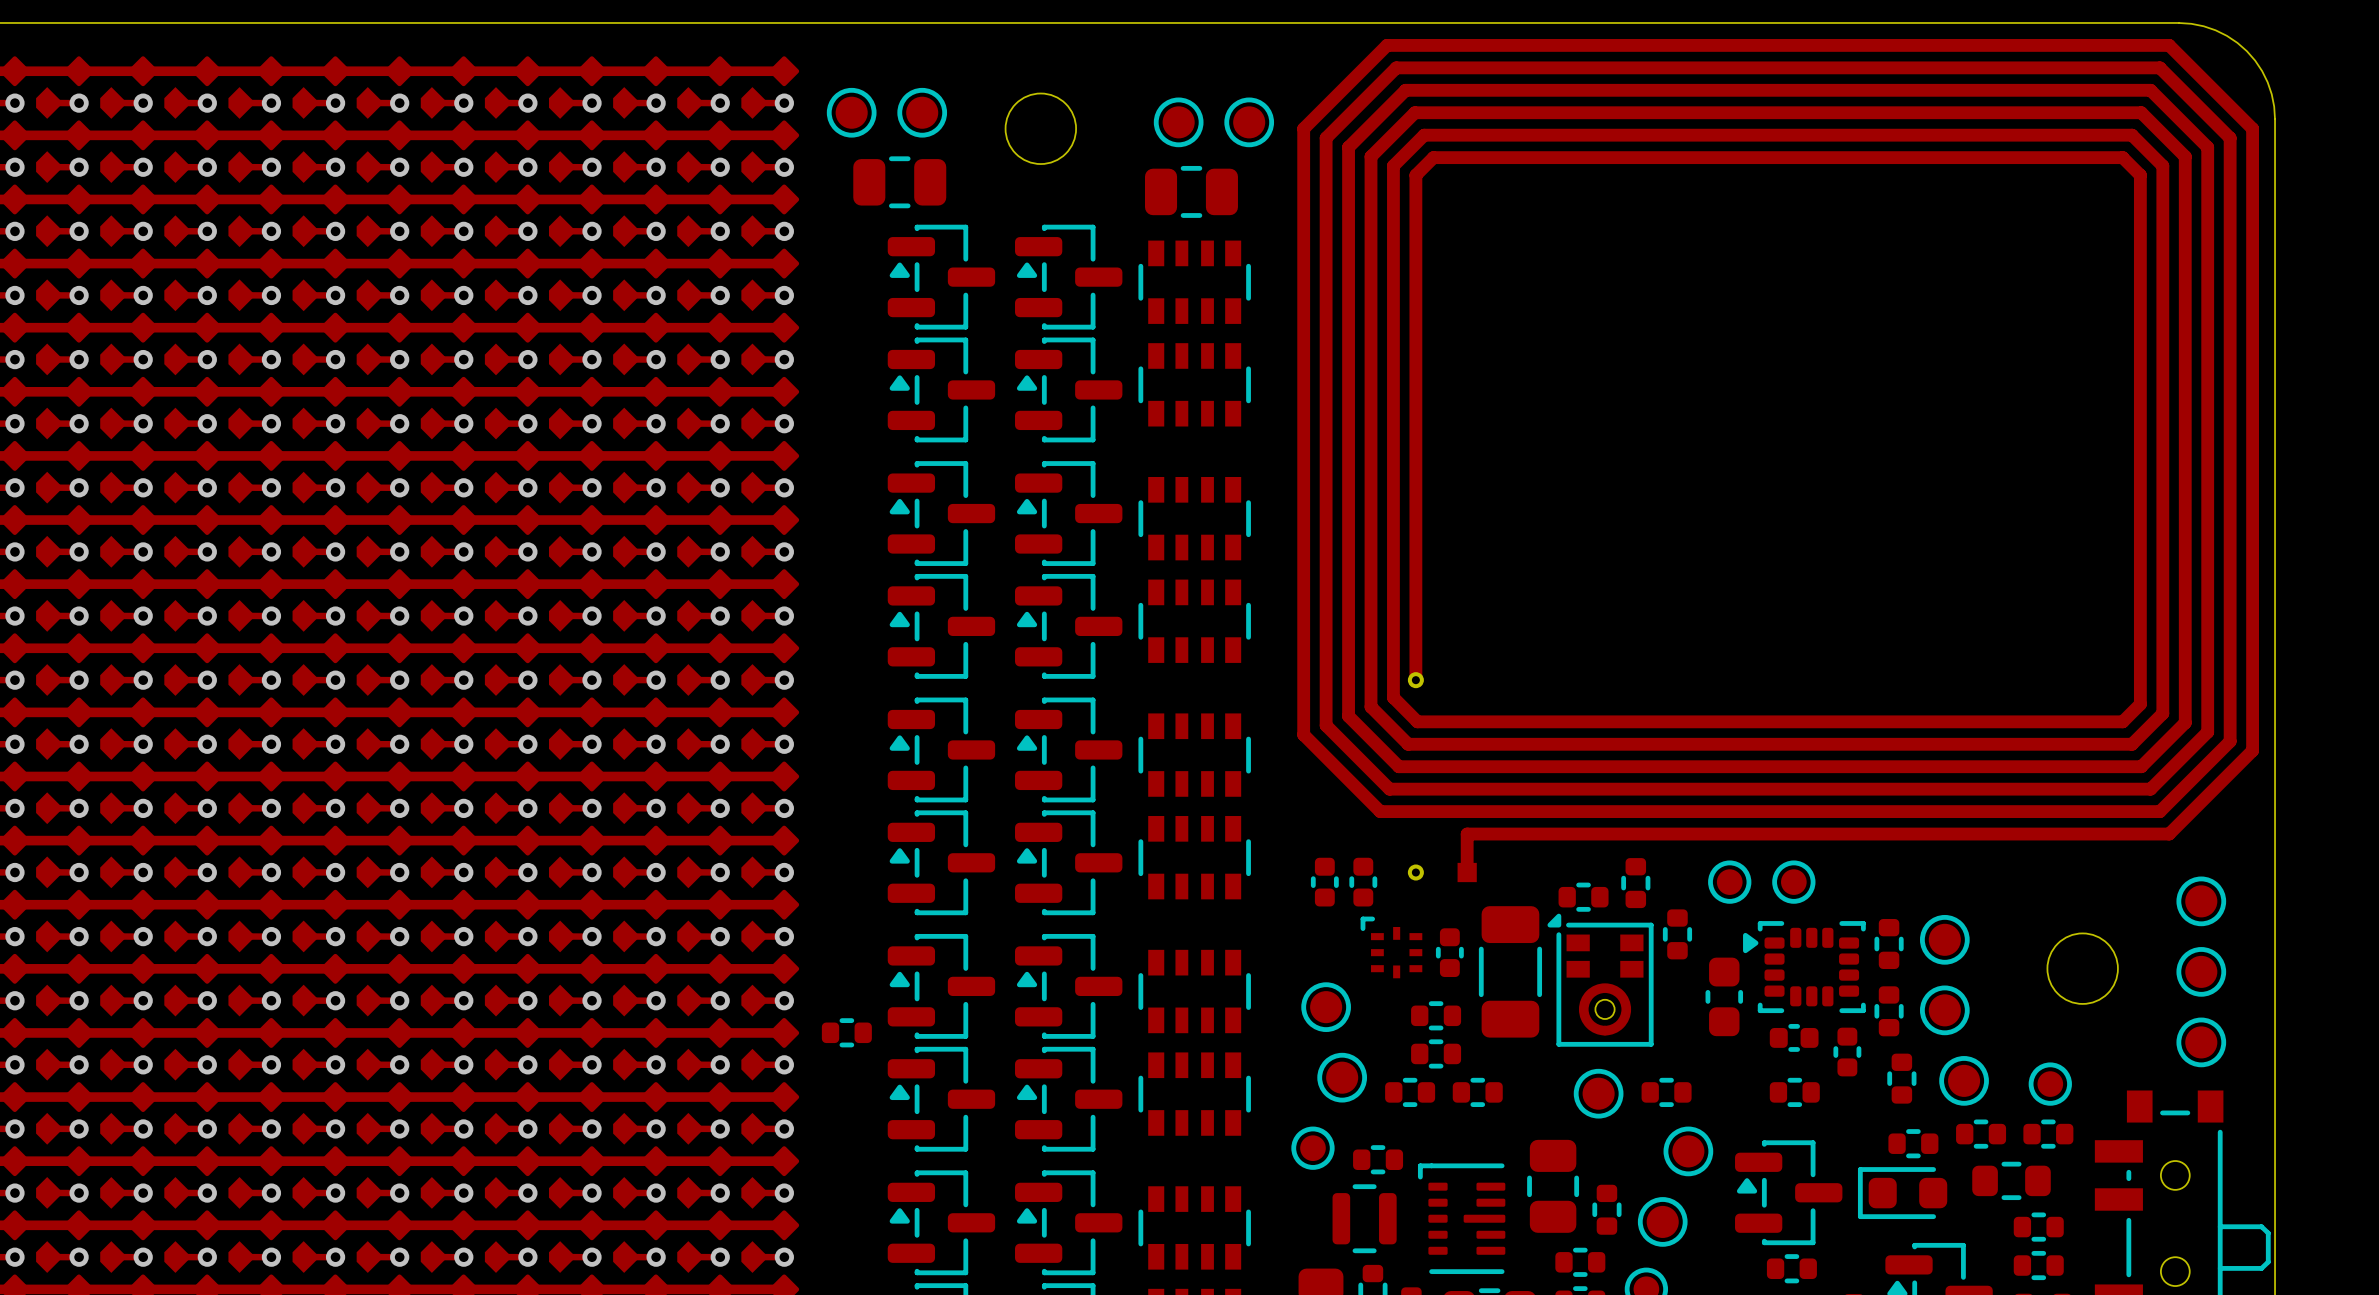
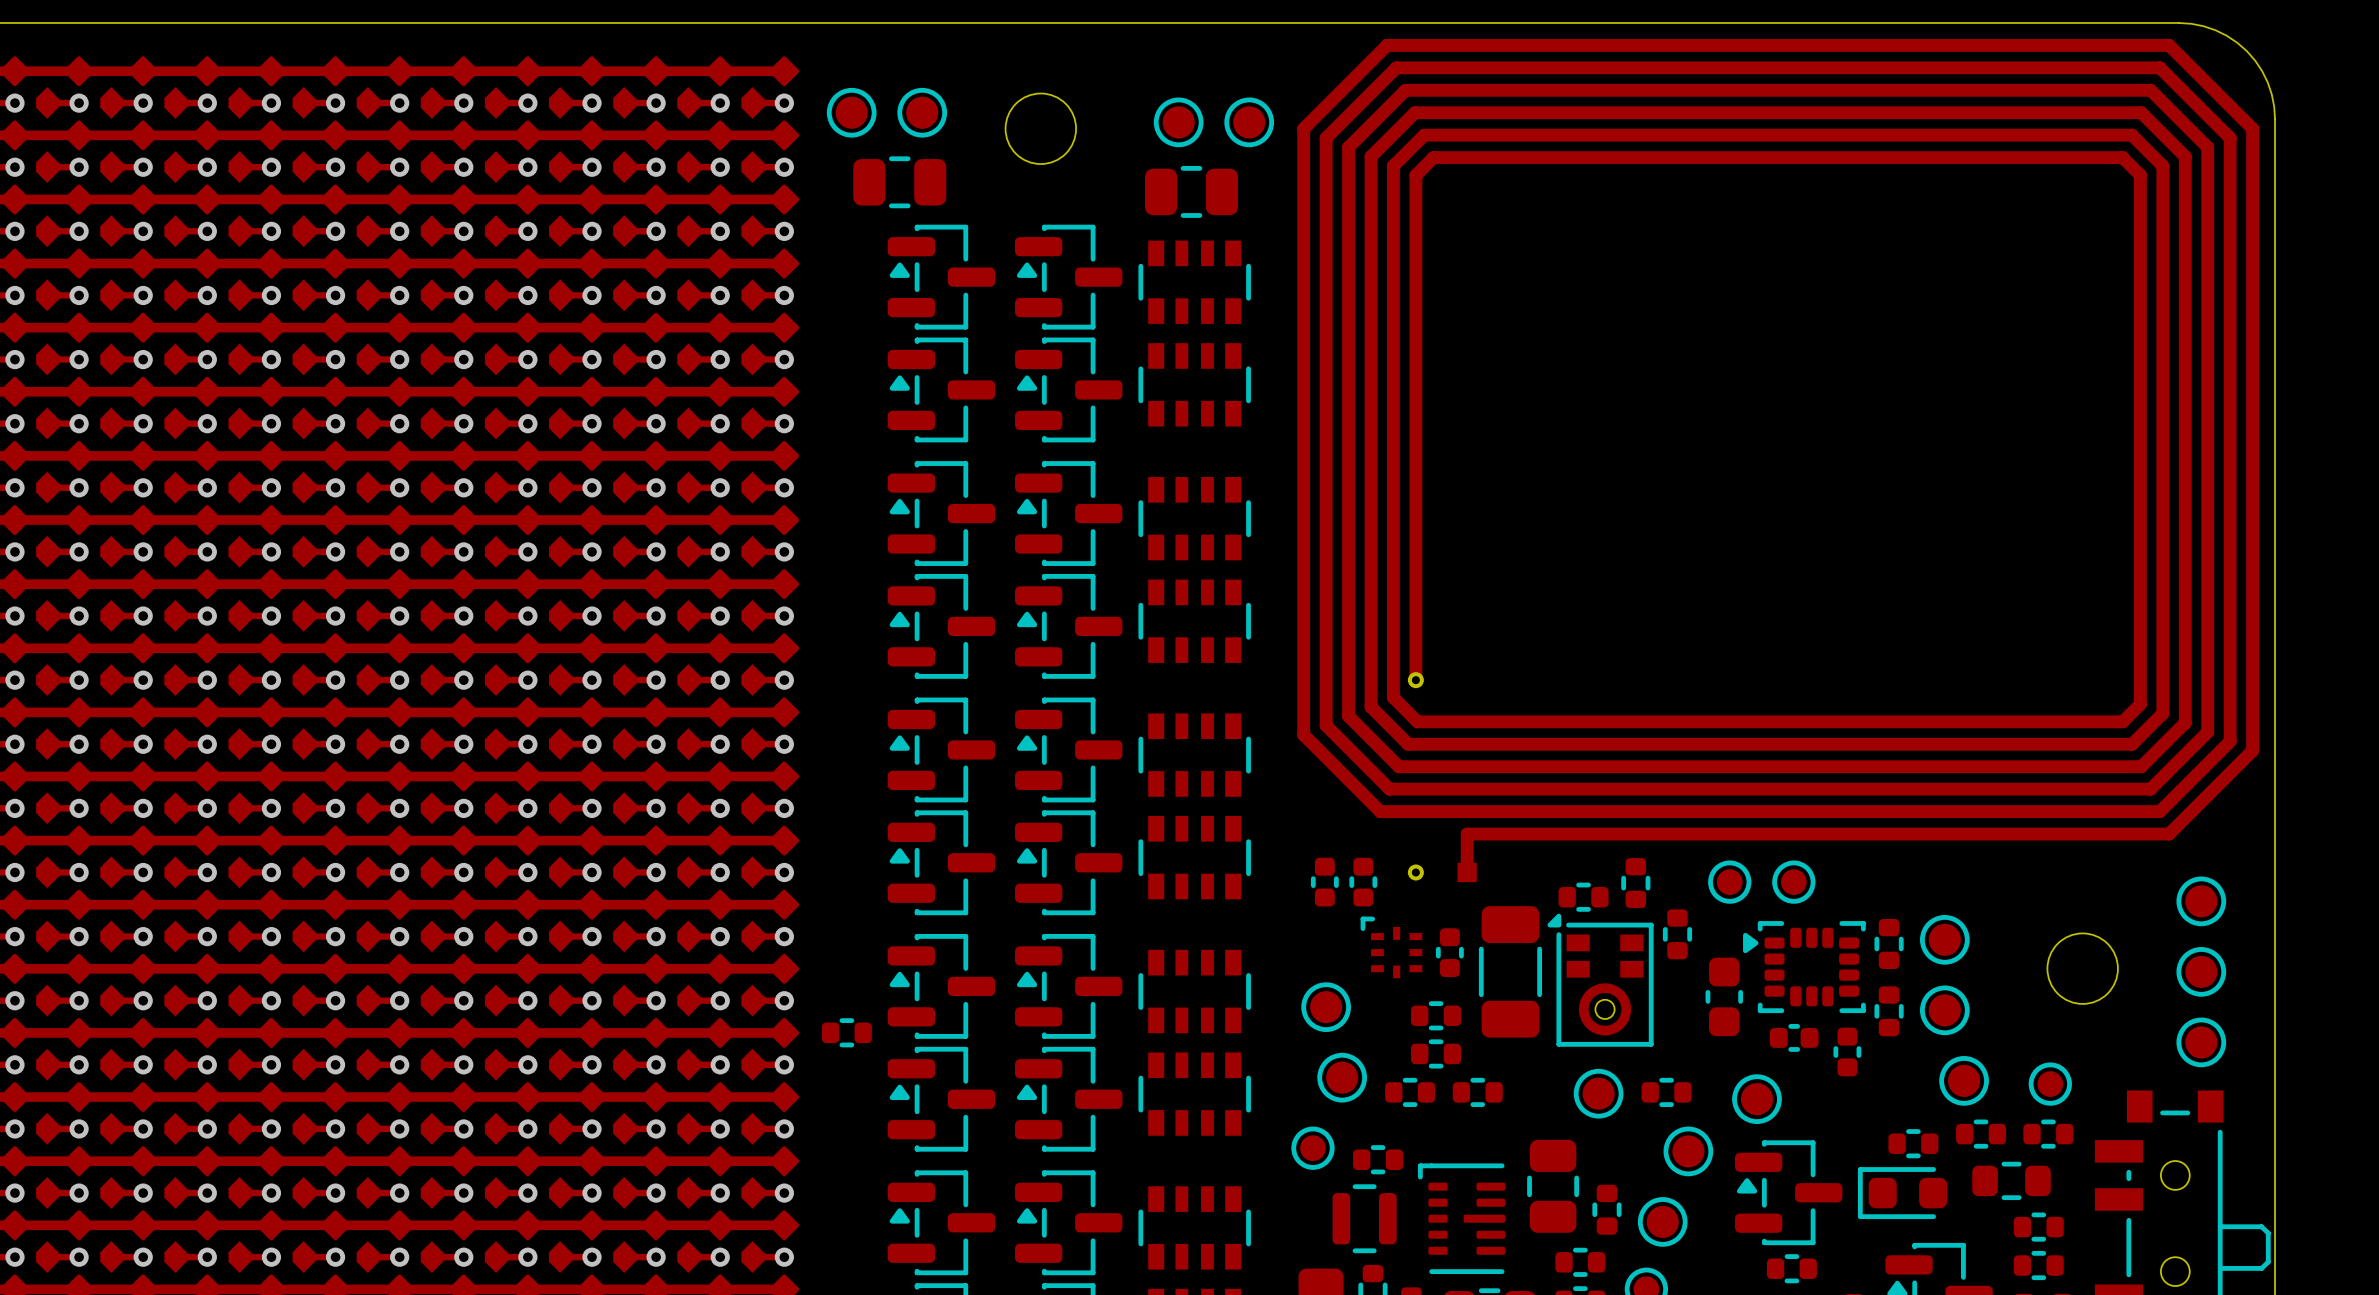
part: (1901, 1078) -> none
part: (1794, 1092) -> none
part: none -> (1756, 1099)

